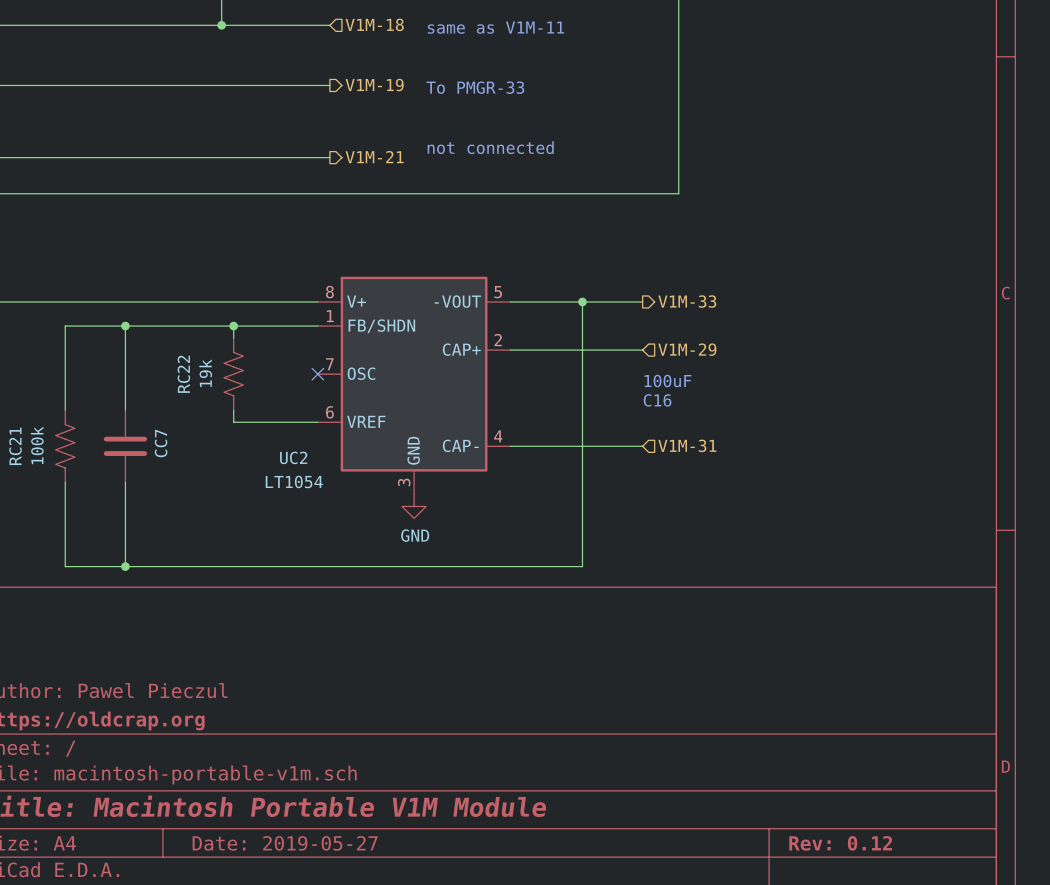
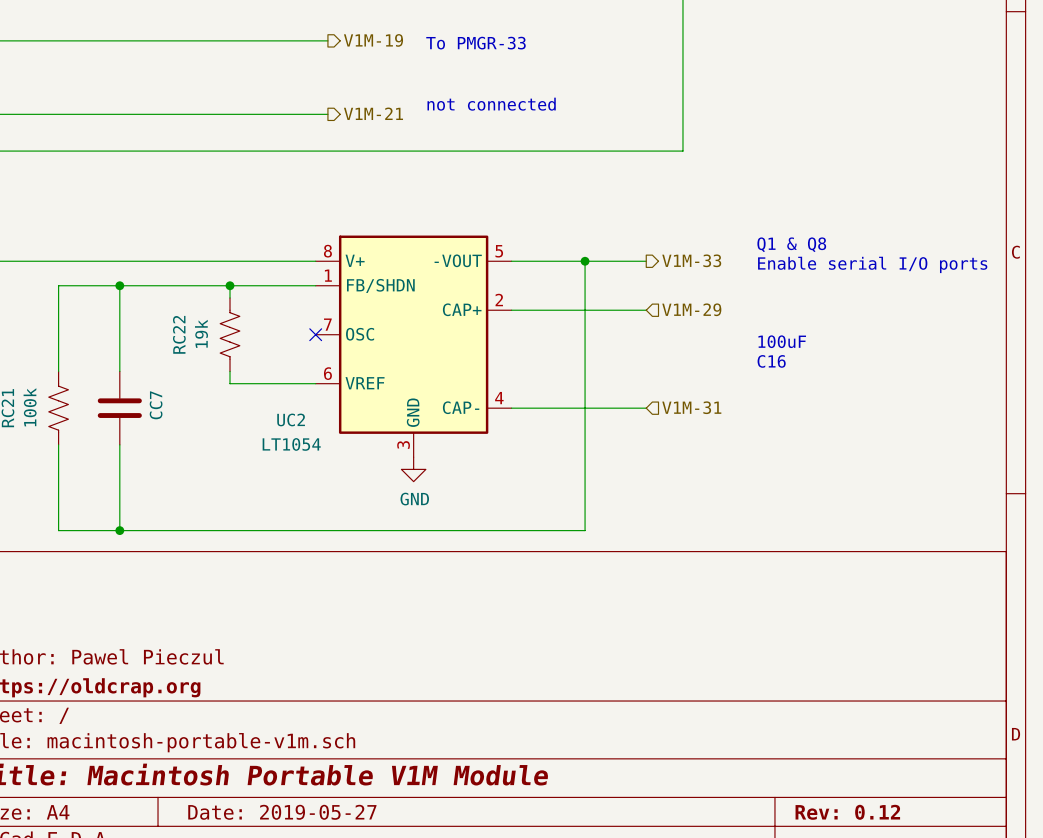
text: none -> Q1 & Q8 (791, 244)
text: none -> Enable serial I/O ports (872, 264)
text position: 100uF (667, 381) -> 100uF (782, 341)
text position: C16 (657, 400) -> C16 (771, 361)

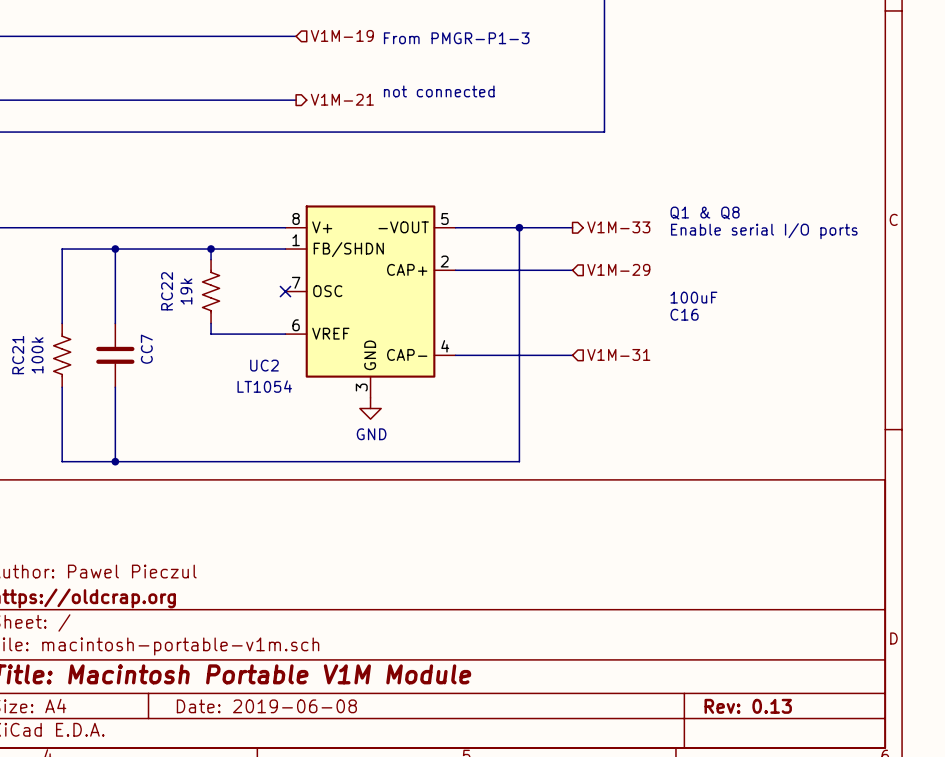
hierarchical label shape: output (373, 40) -> input (342, 35)
text: To PMGR-33 (476, 43) -> From PMGR-P1-3 (456, 38)
title block: Date: 2019-05-27 (282, 812) -> Date: 2019-06-08 (266, 706)
title block: Rev: 0.12 (847, 812) -> Rev: 0.13 (748, 706)

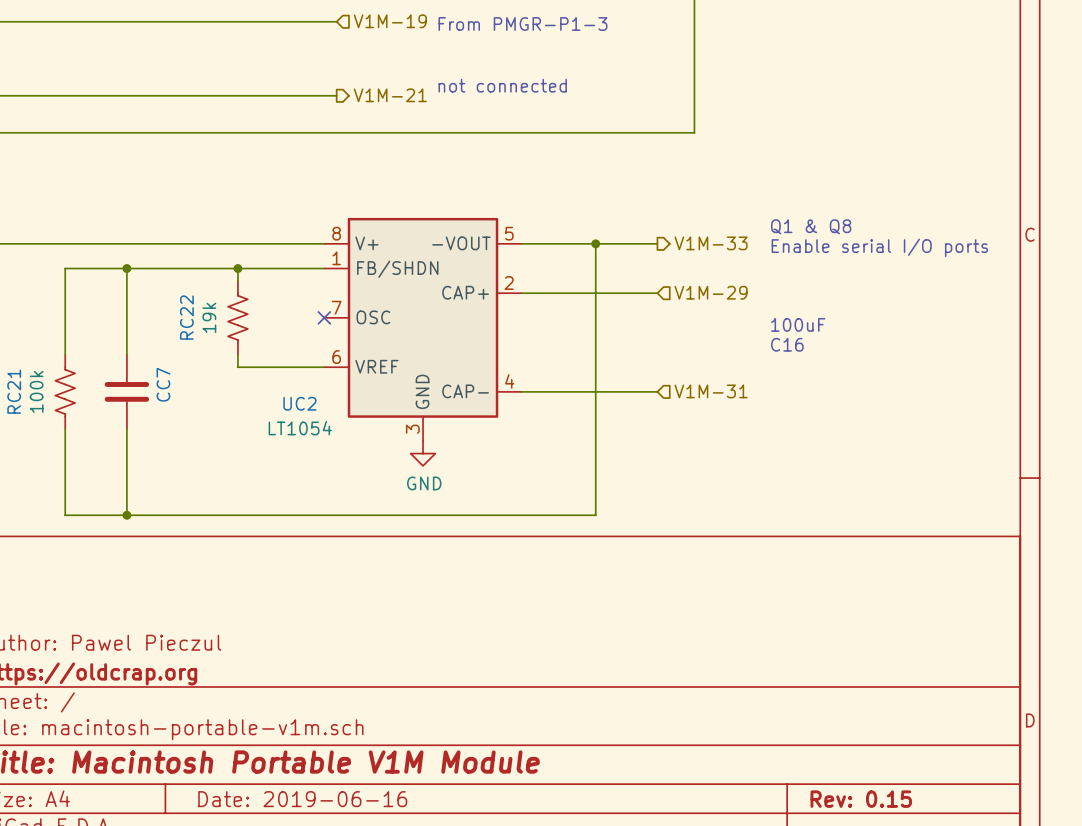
title block: Date: 2019-06-08 (266, 706) -> Date: 2019-06-16 (302, 799)
title block: Rev: 0.13 (748, 706) -> Rev: 0.15 (861, 799)

